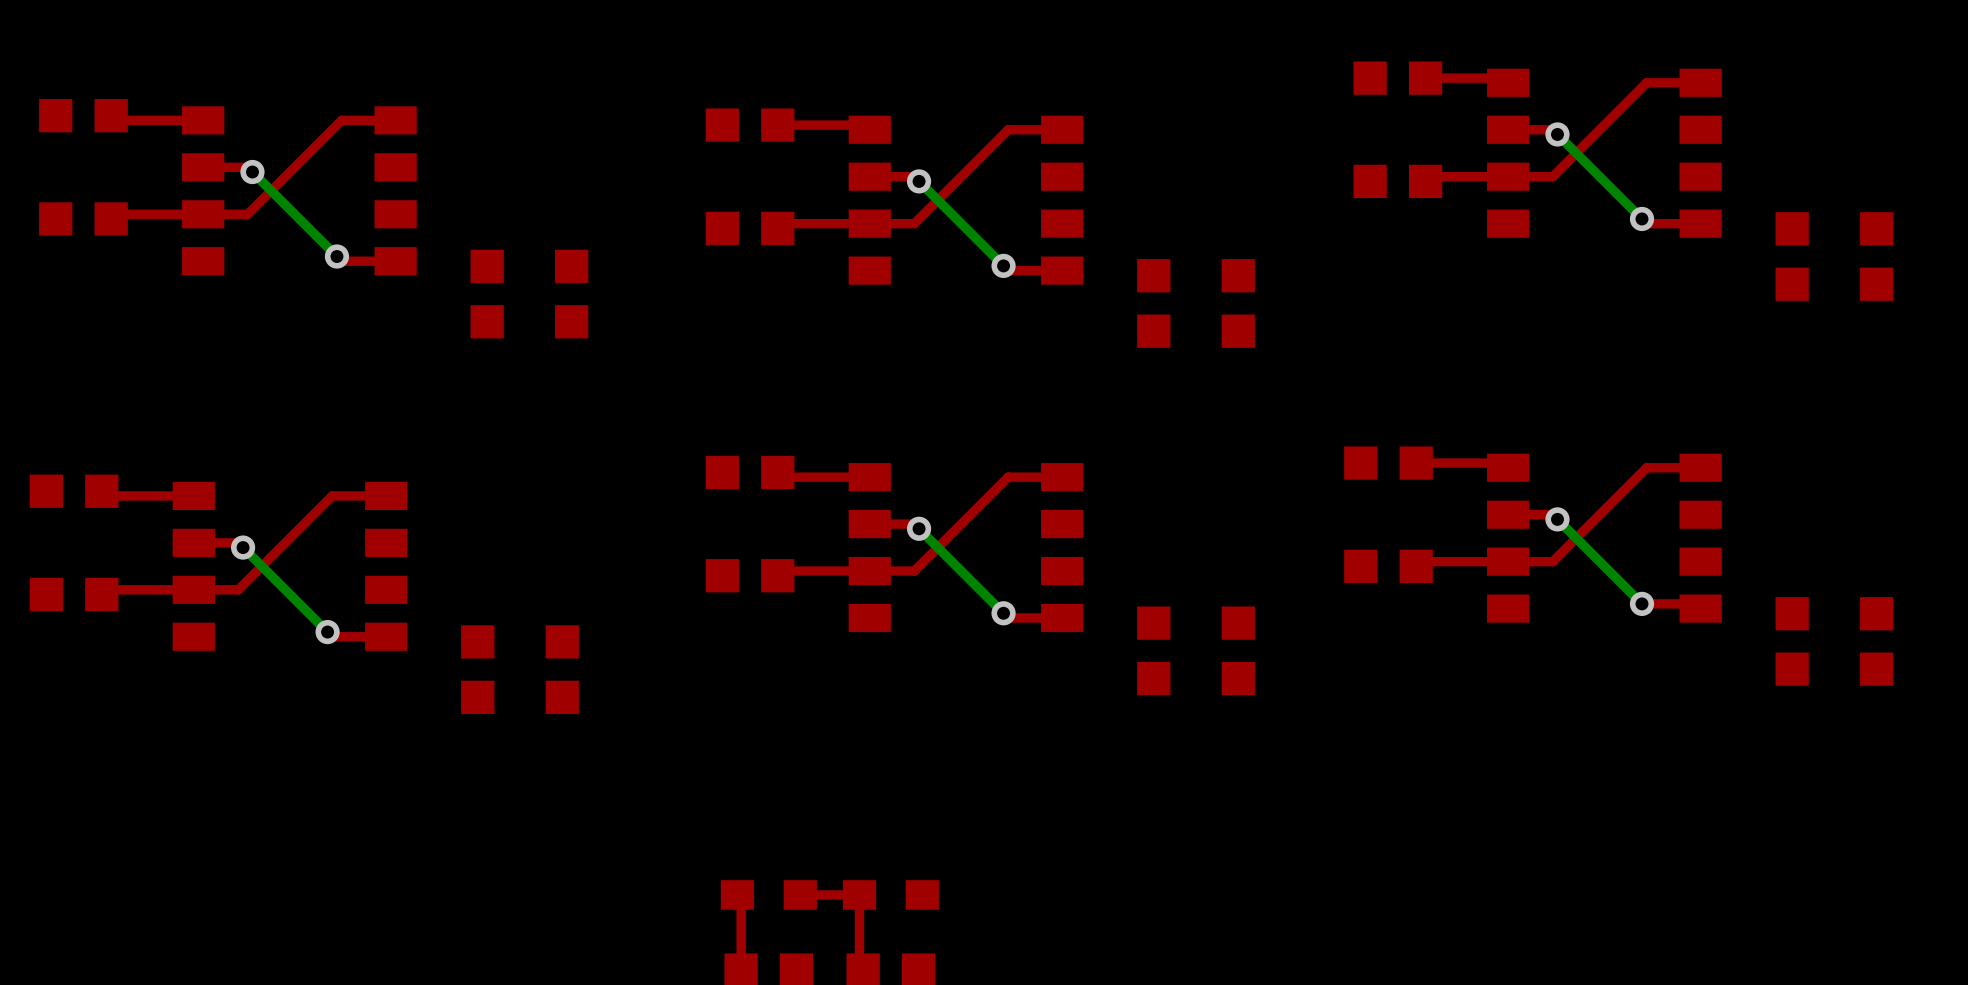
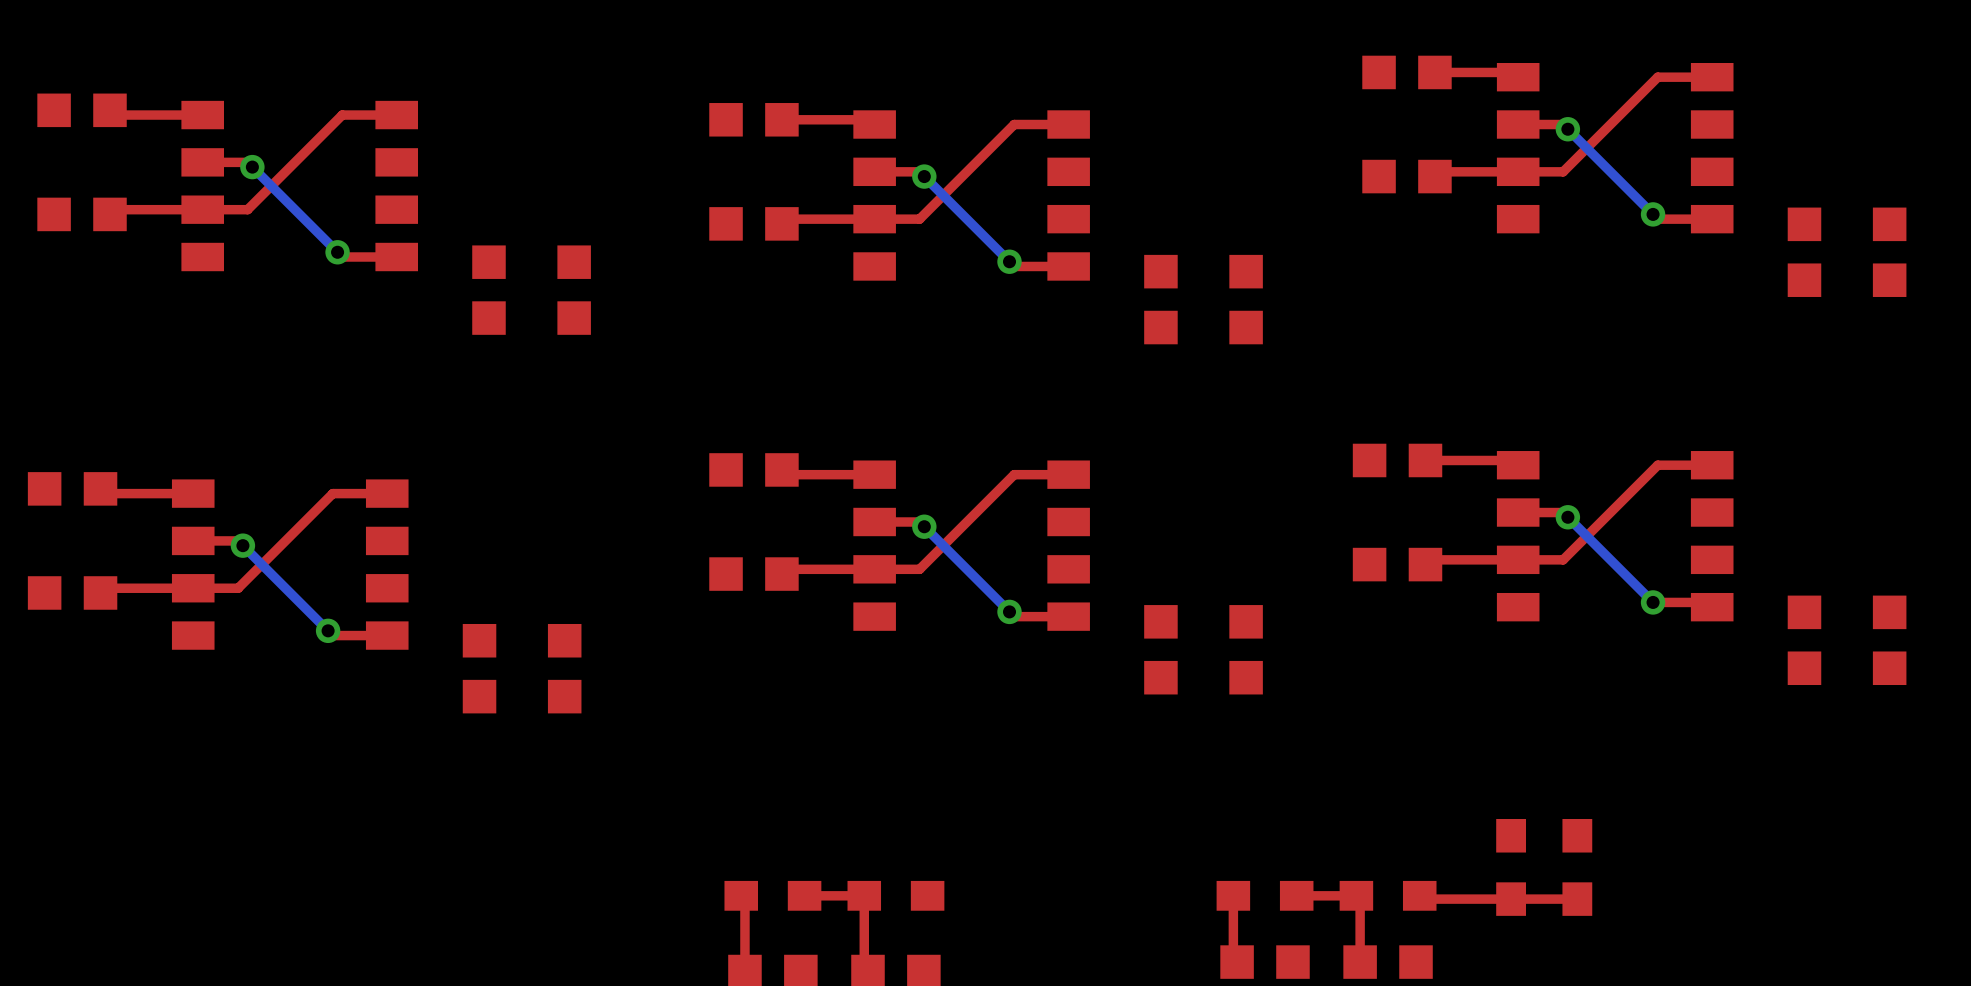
part: none -> (1511, 867)
part: none -> (1577, 867)
top track: none -> (1233, 895) (1233, 958) (1237, 962)
part: none -> (1265, 895)
top track: none -> (1296, 895) (1356, 895) (1360, 899) (1360, 962)
part: none -> (1388, 895)
top track: none -> (1419, 895) (1423, 899) (1577, 899)
part: none -> (1265, 962)
part: none -> (1388, 962)

